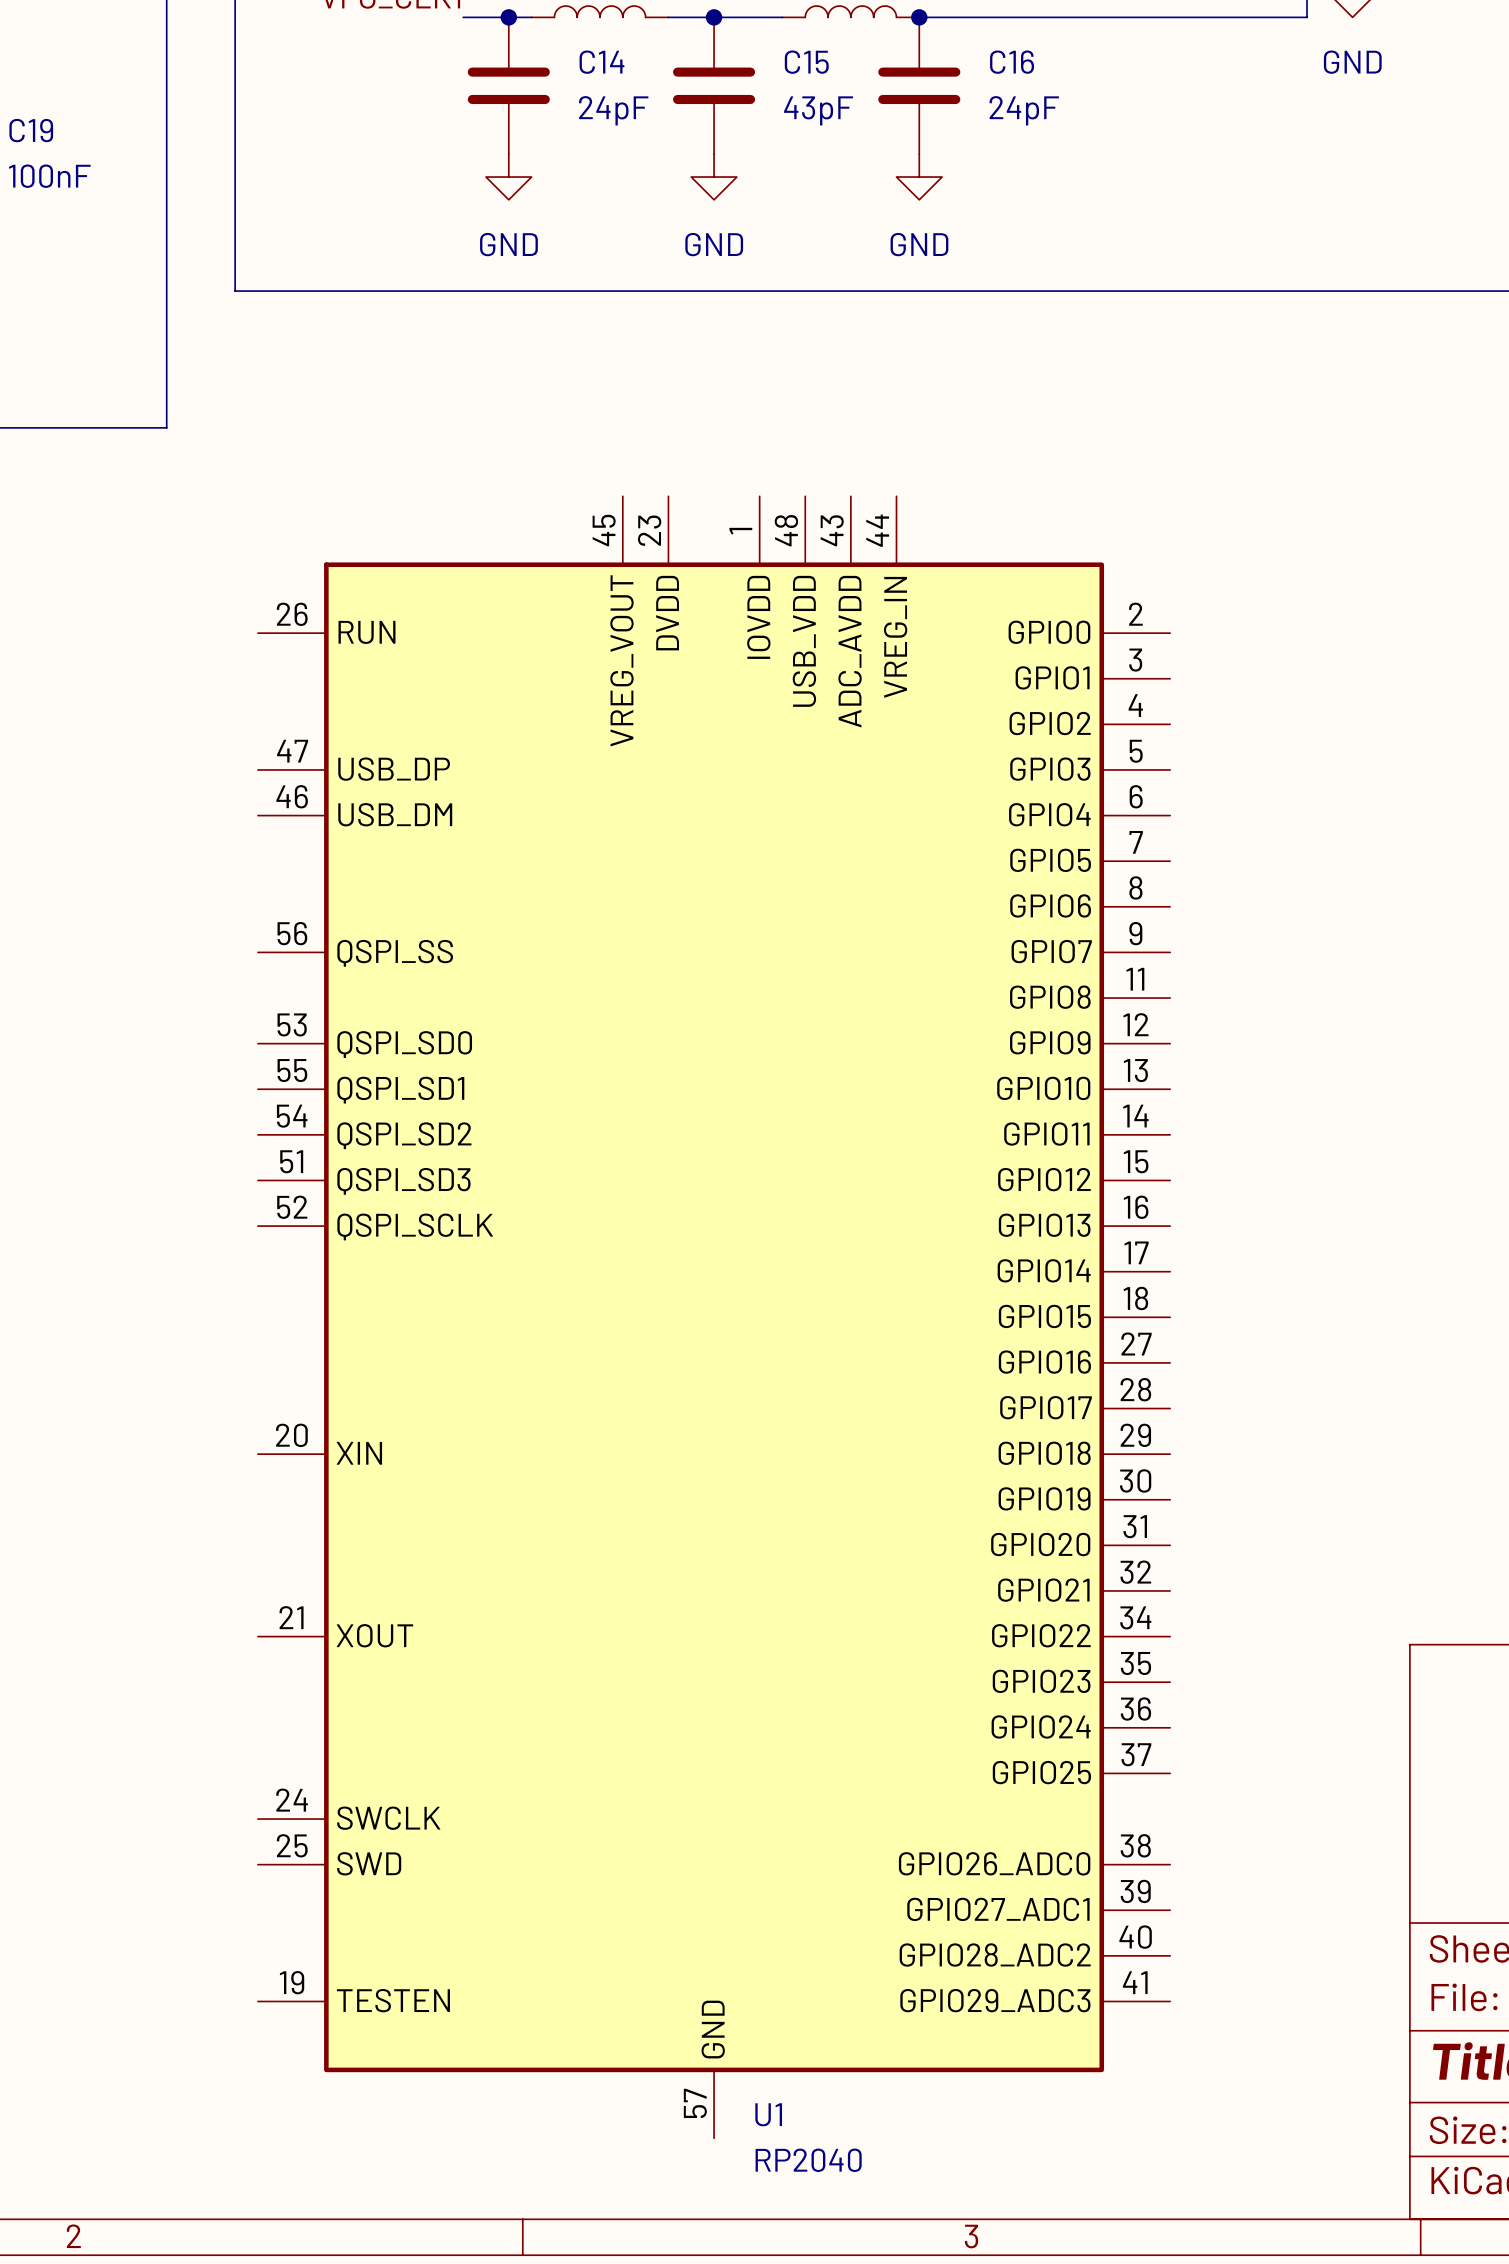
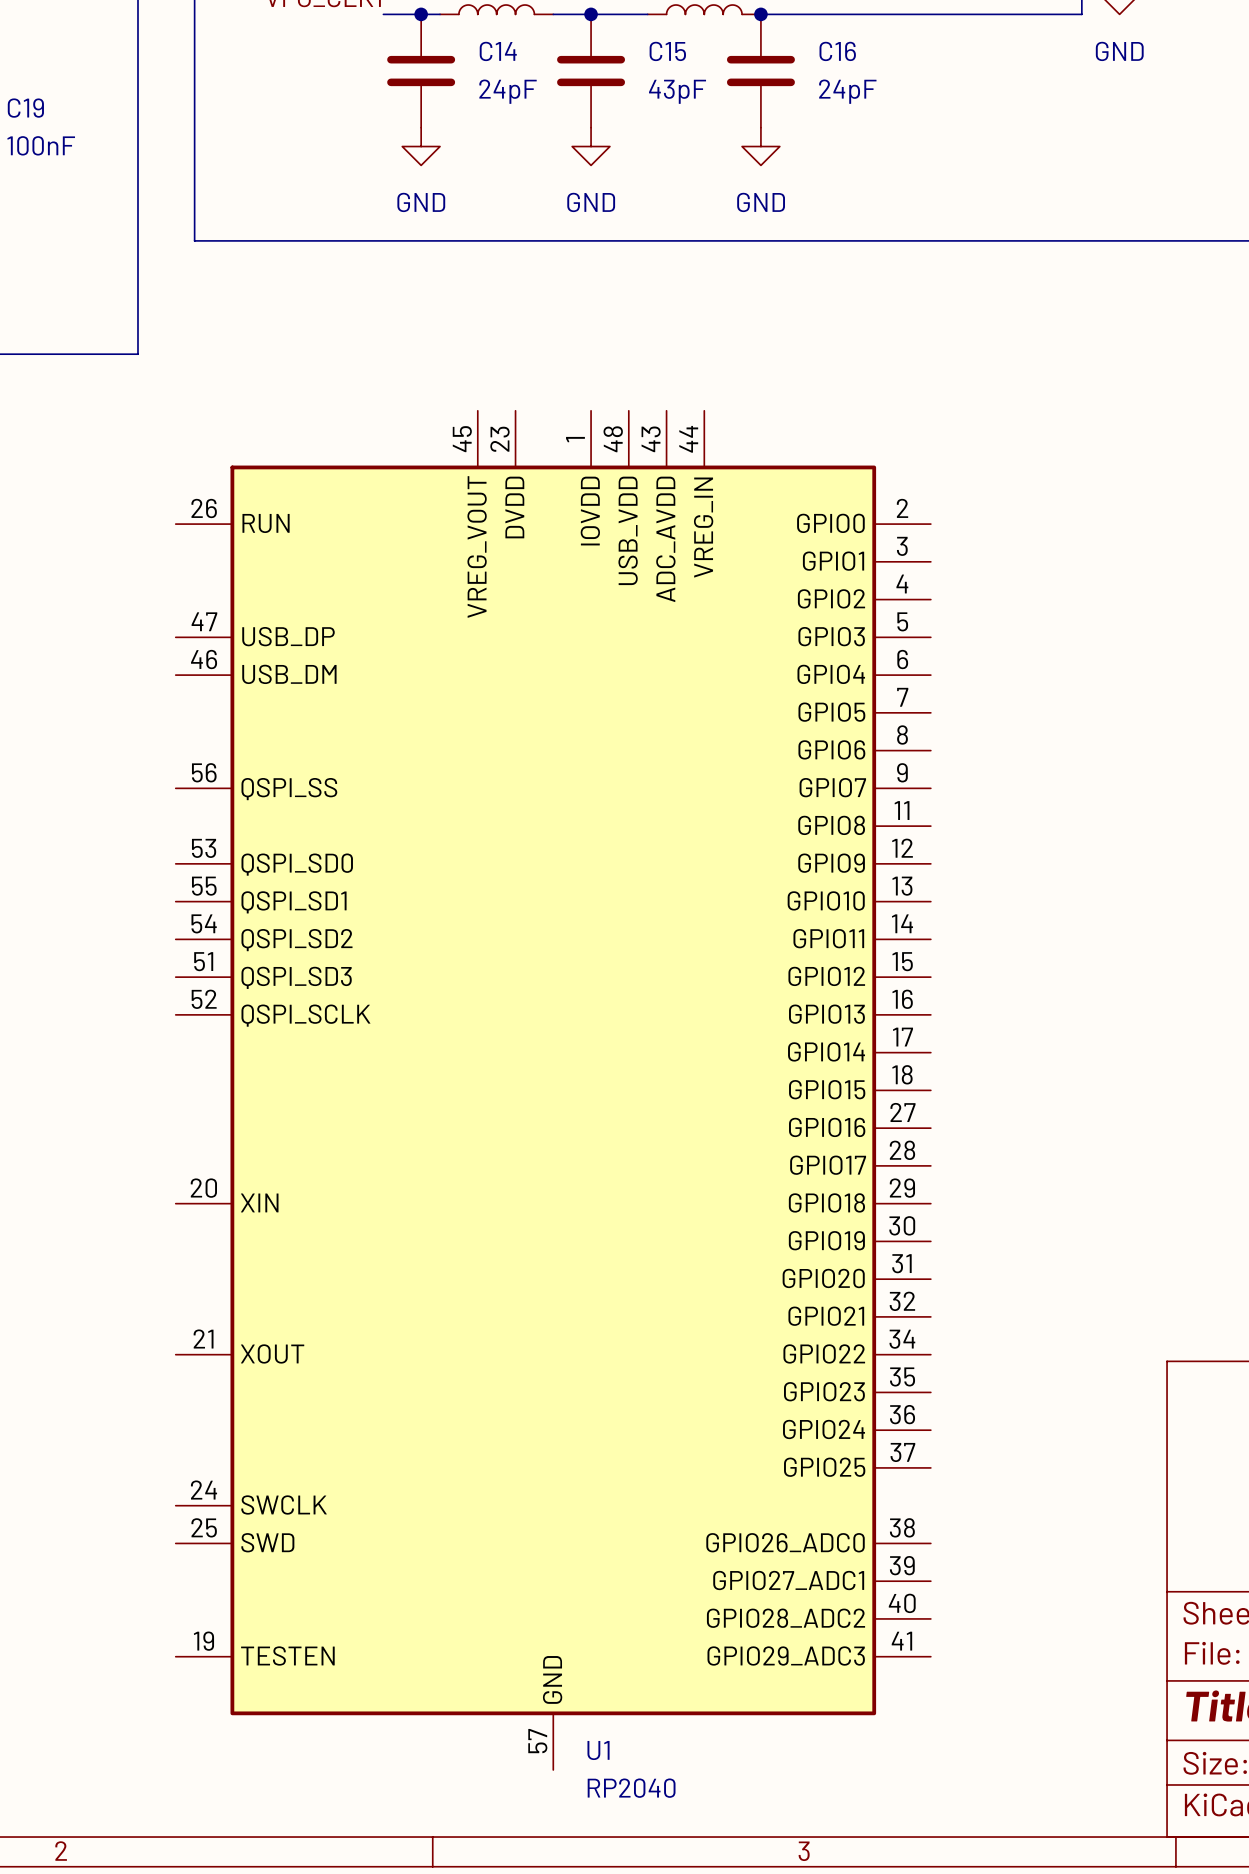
U1 position: (714, 1317) -> (553, 1090)

